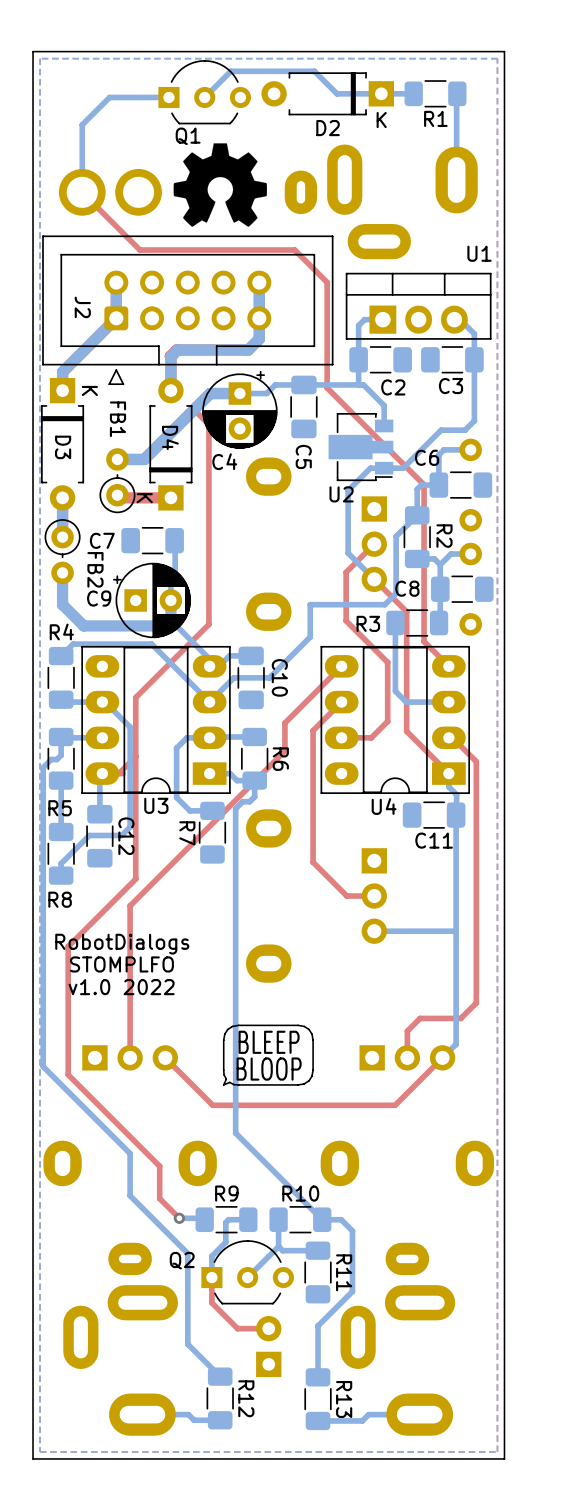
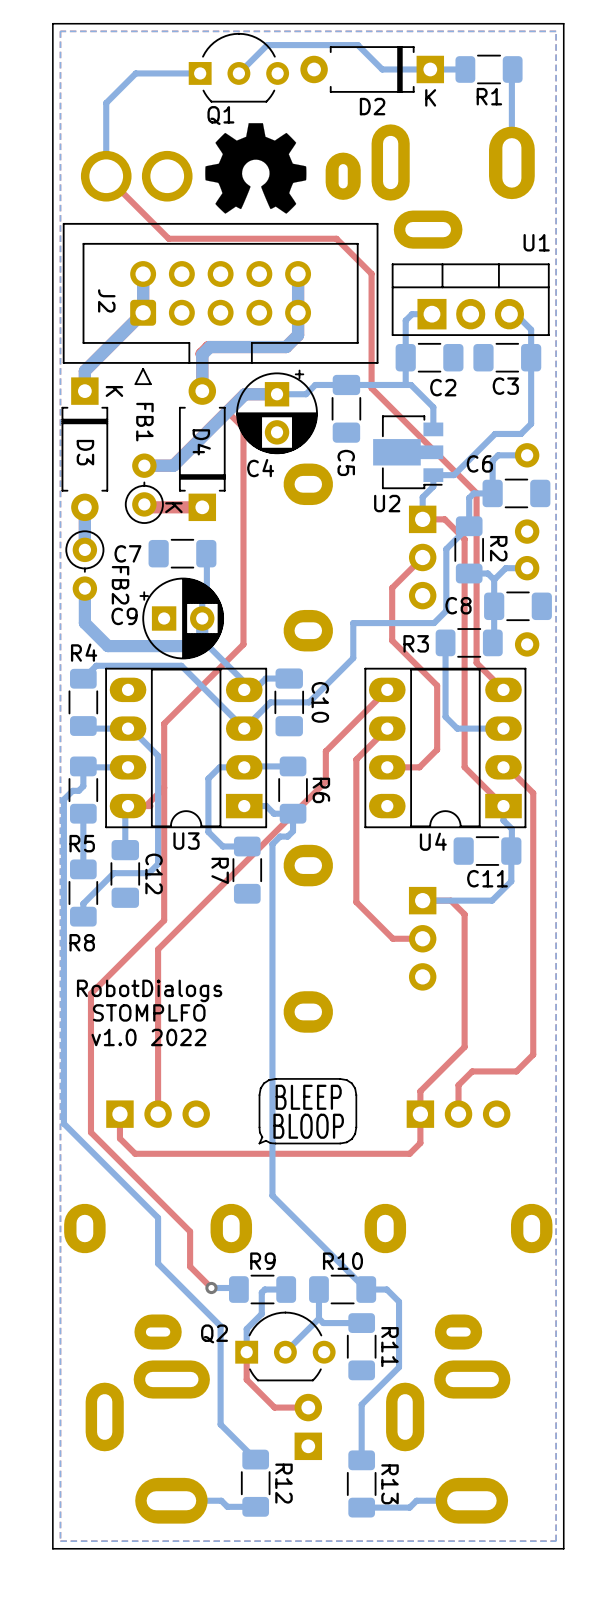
bottom track: (384, 468) (370, 468) (348, 490) (348, 553) (374, 579) -> (433, 475) (433, 486) (422, 497) (422, 519)
top track: (374, 579) (406, 611) (406, 731) (413, 737) -> (422, 519) (444, 519) (464, 539) (464, 767)
bottom track: (456, 843) (456, 1044) (442, 1057) -> (511, 881) (492, 900) (422, 900)
top track: none -> (422, 900) (450, 900) (464, 914) (464, 1047) (420, 1091) (420, 1143) (409, 1153) (135, 1153) (119, 1138) (119, 1114)
bottom track: (456, 929) (374, 931) -> none
top track: (442, 1057) (395, 1105) (212, 1105) (165, 1057) -> none

